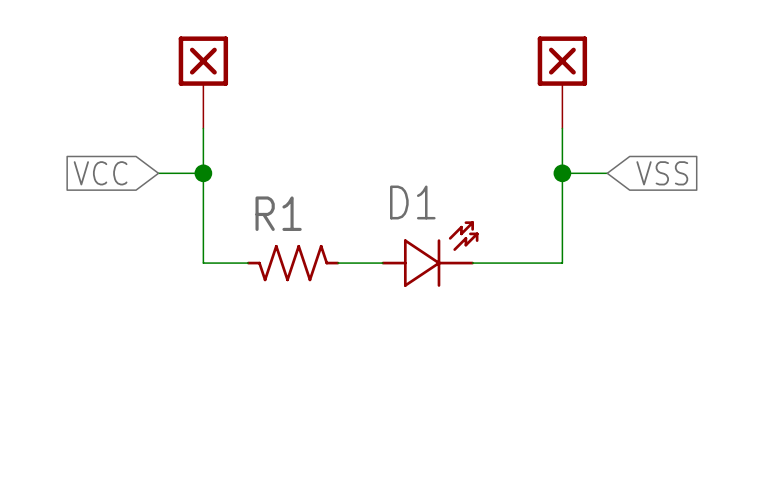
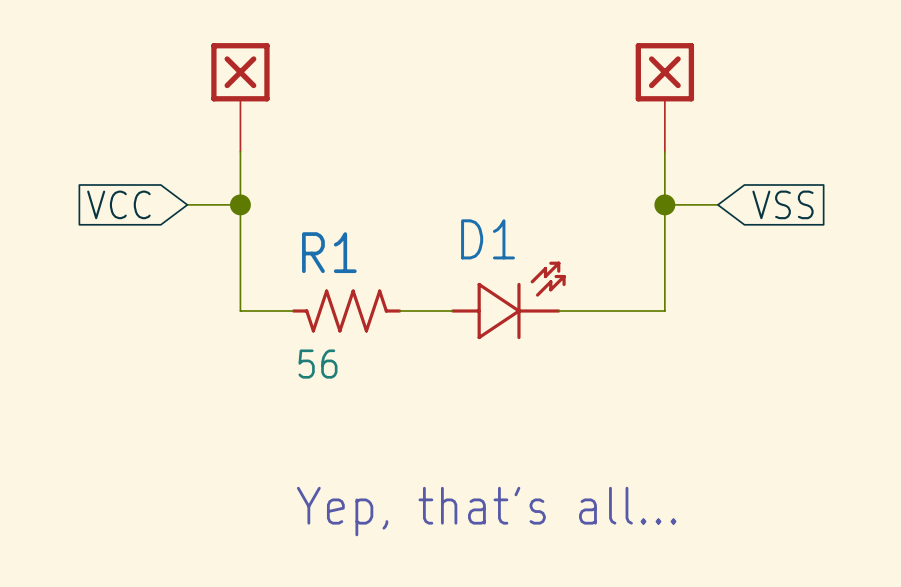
R1 value: none -> 56 (317, 364)
text: none -> Yep, that's all... (486, 511)

